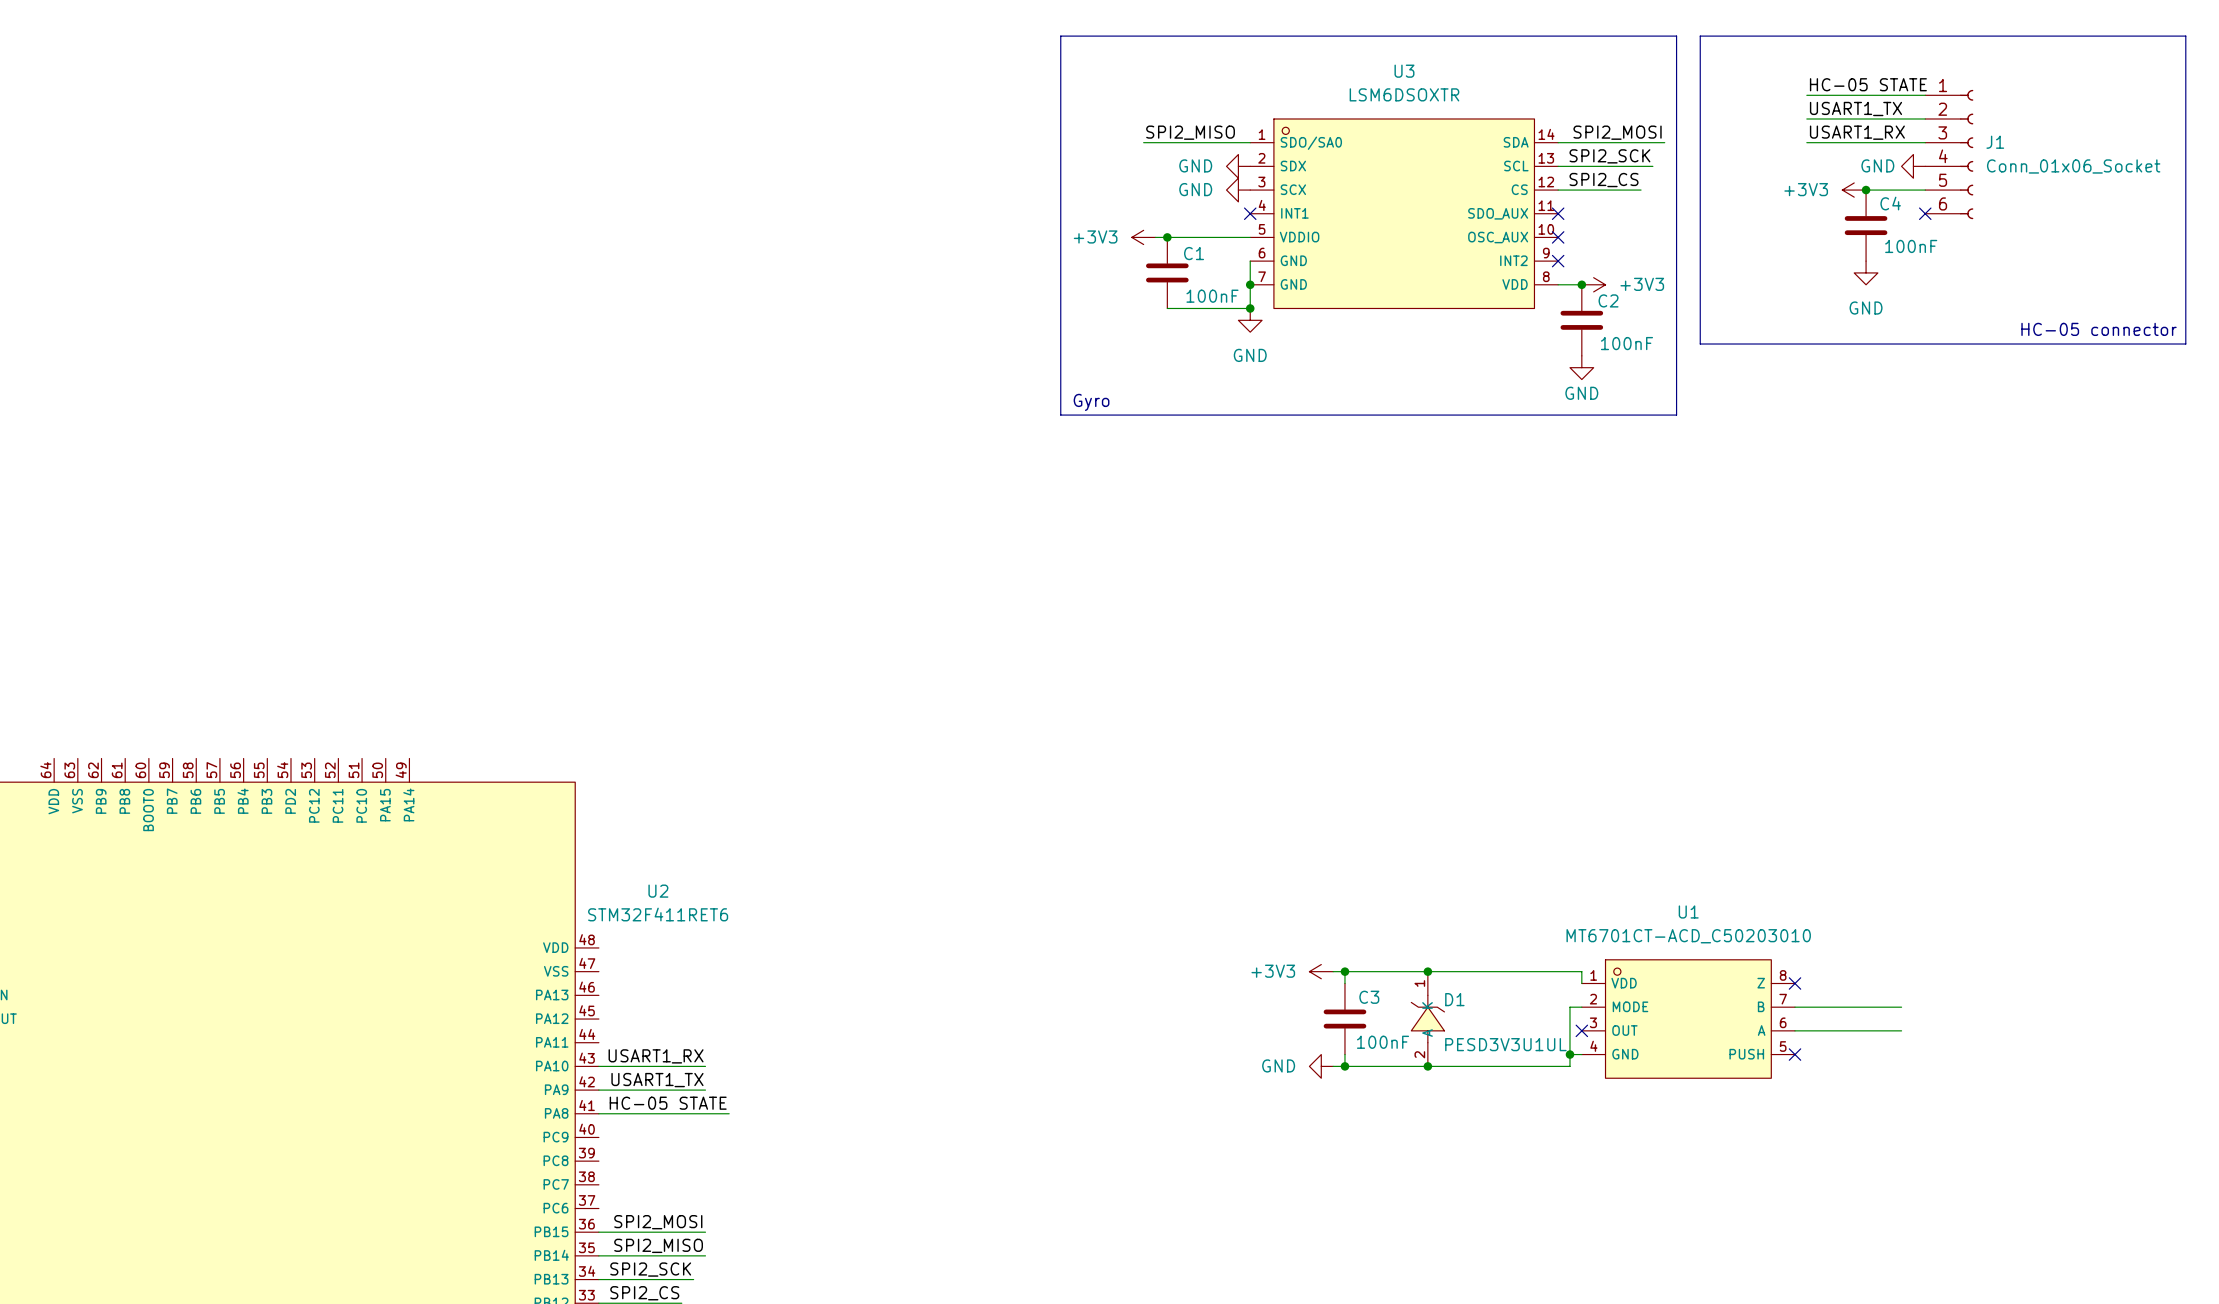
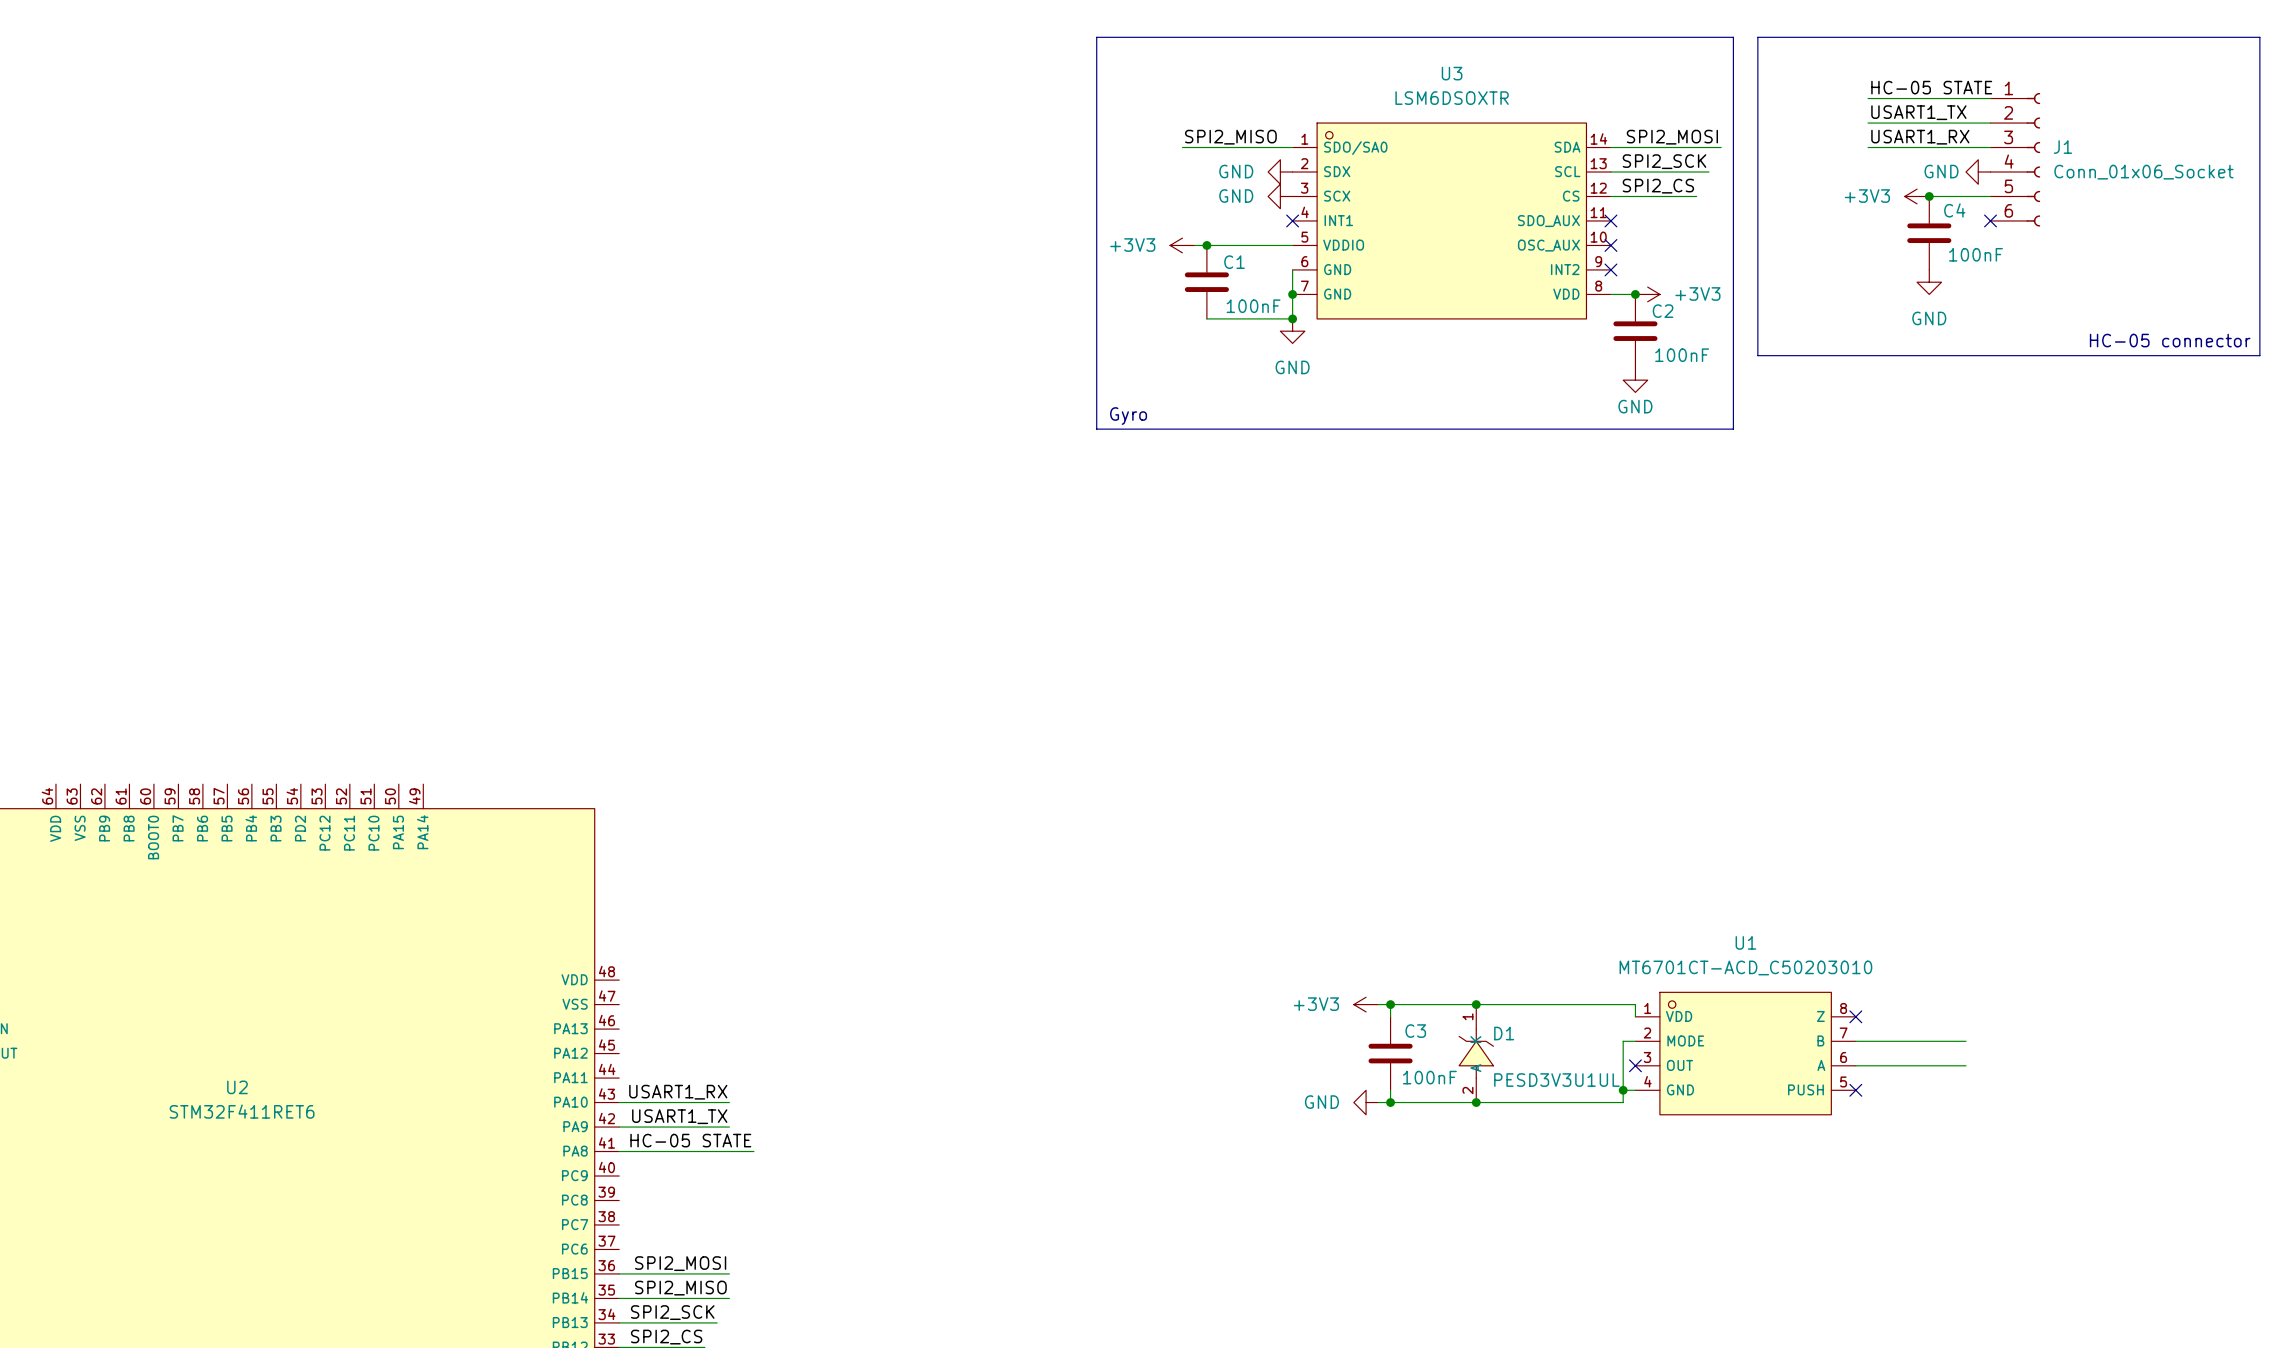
U2 name position: U2 (658, 891) -> U2 (237, 1087)
U2 value position: STM32F411RET6 (658, 914) -> STM32F411RET6 (242, 1111)

